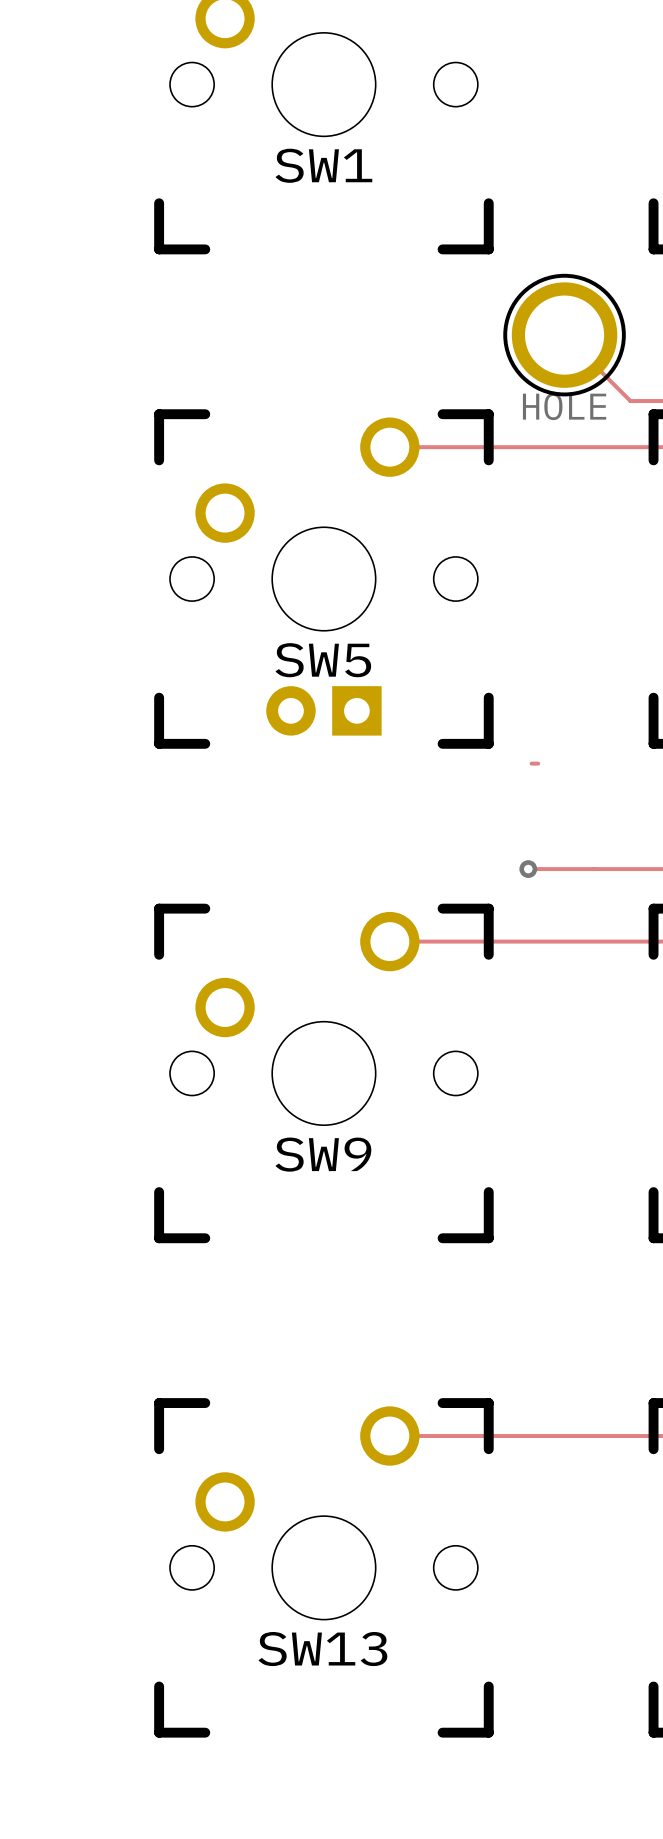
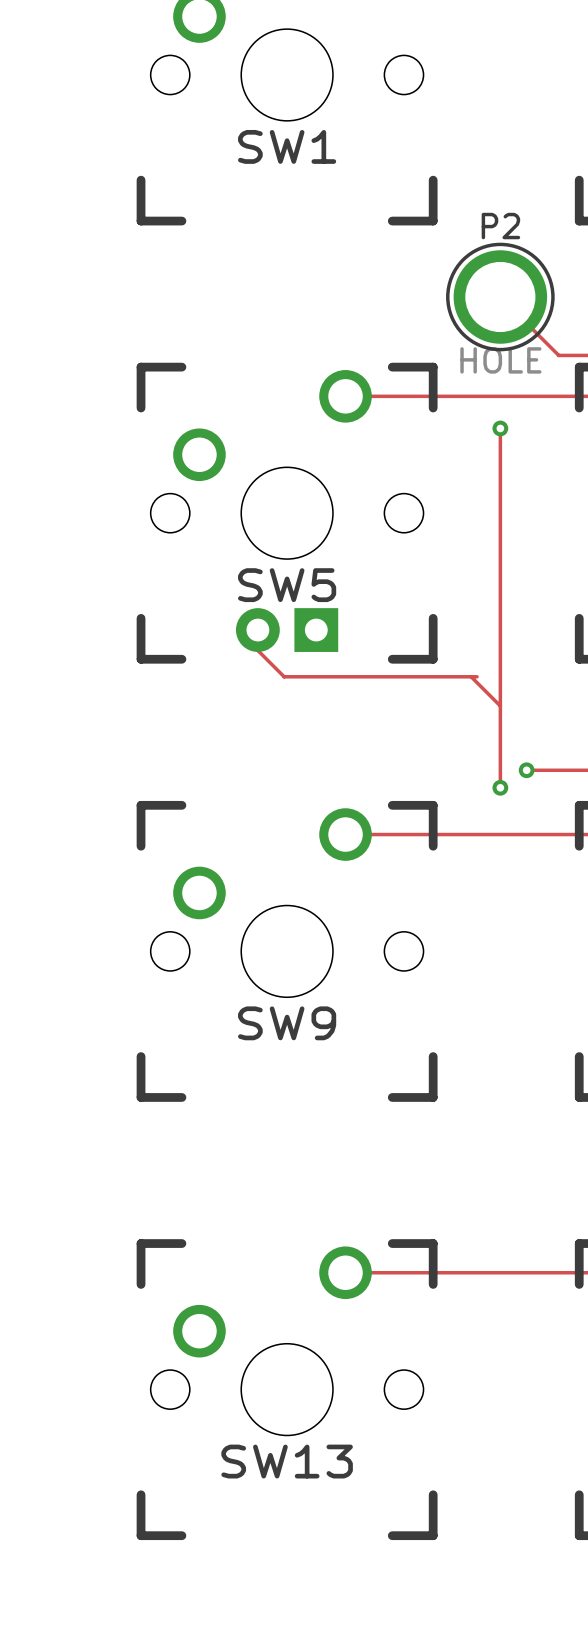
P2 name: none -> P2 (500, 226)
track: none -> (500, 428) (500, 787)
via: none -> (500, 428)
track: none -> (257, 630) (257, 650) (284, 676) (471, 676) (500, 706)
track: (528, 869) (594, 869) -> none
via: (528, 869) -> none
via: none -> (526, 770)
via: none -> (500, 787)

